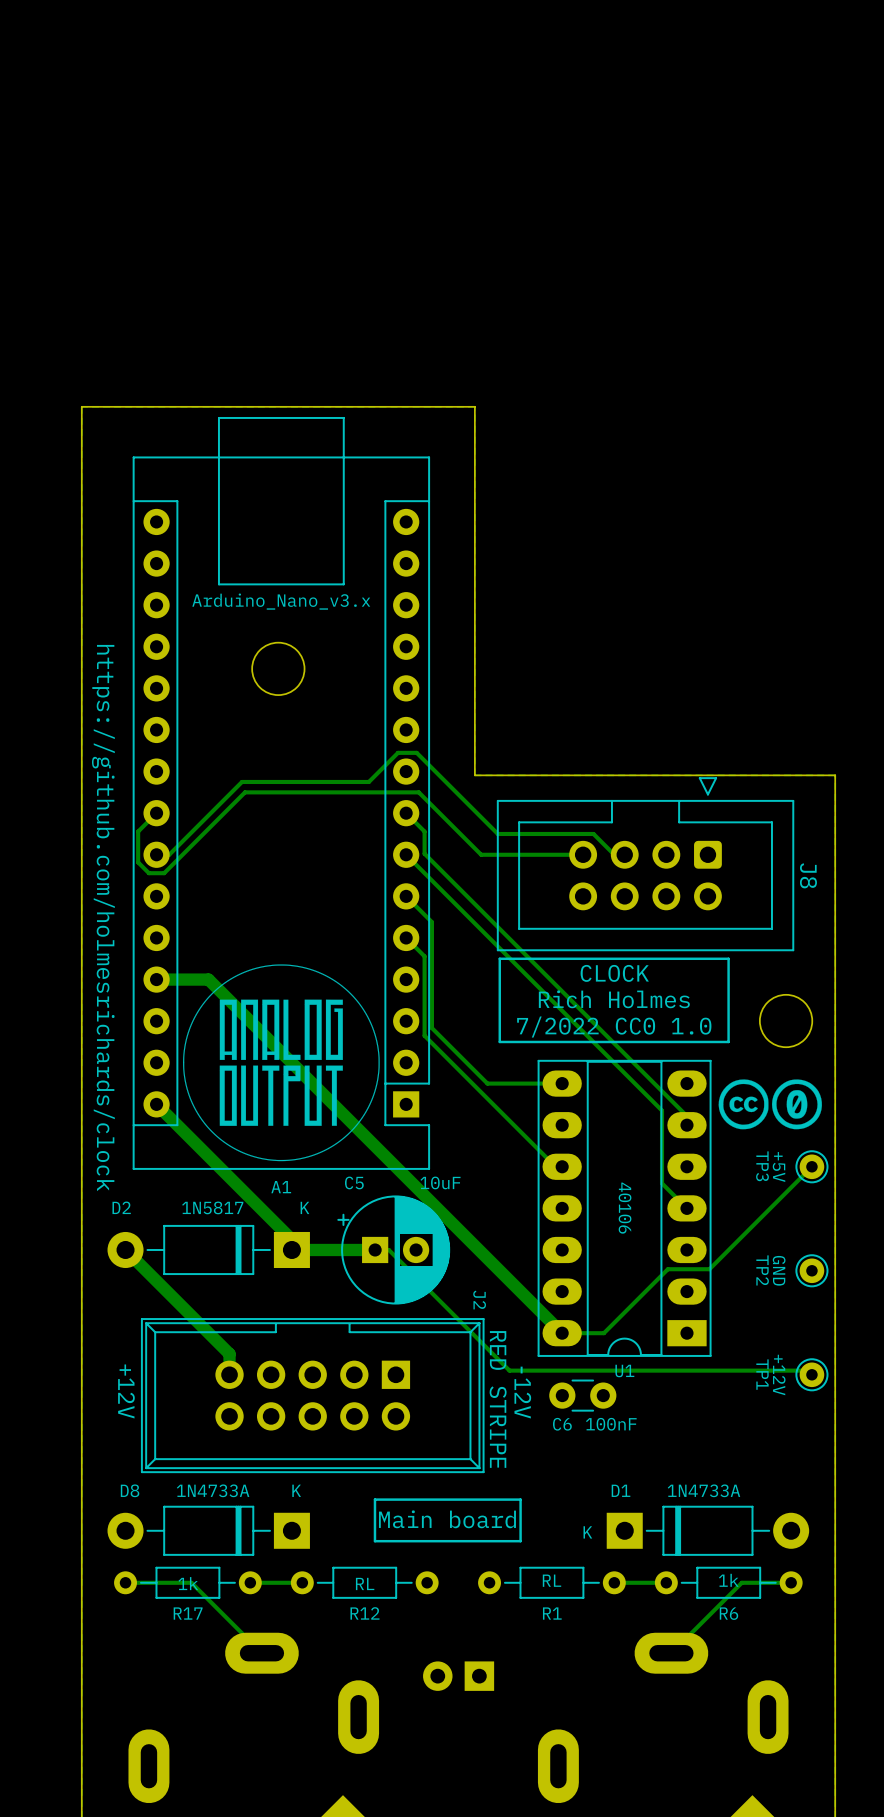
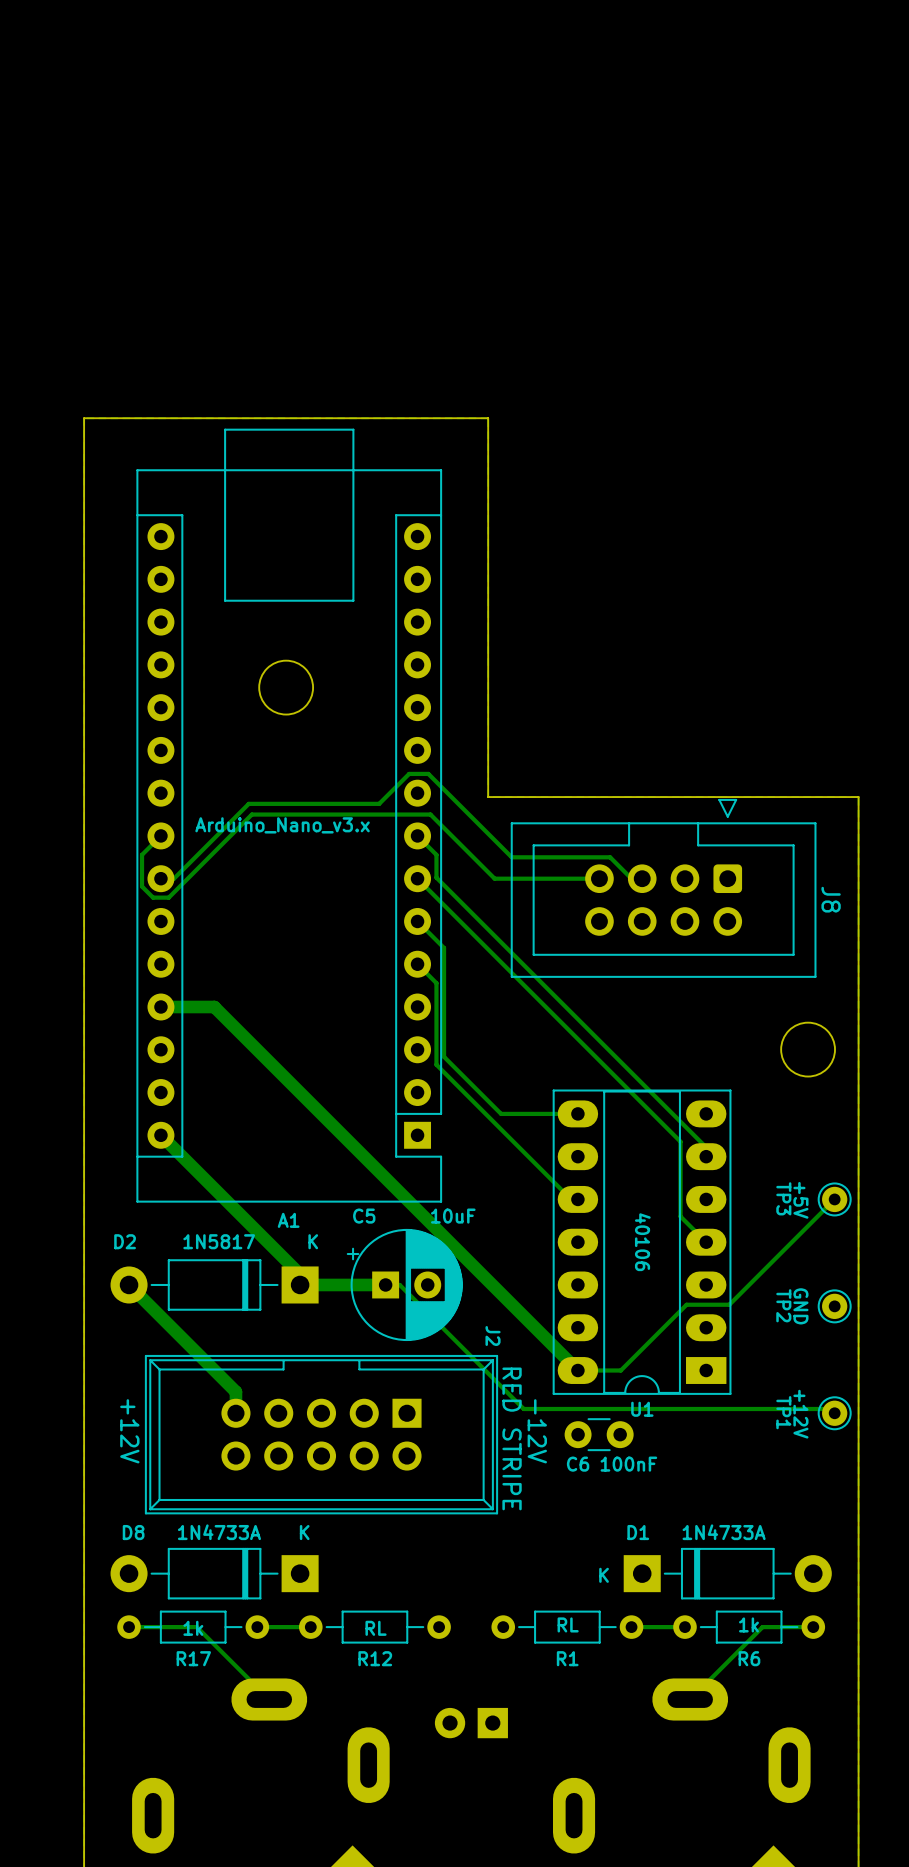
A1 value position: Arduino_Nano_v3.x (281, 601) -> Arduino_Nano_v3.x (282, 825)
text: https://github.com/holmesrichards/clock (103, 918) -> none
line: (728, 958) (499, 958) (499, 1041) (728, 1041) (728, 958) -> none
drawing: [183, 964, 380, 1162] -> none
text: CLOCK (614, 973) -> none
text: Rich Holmes (614, 999) -> none
text: 7/2022 CC0 1.0 (614, 1027) -> none
drawing: [718, 1079, 822, 1130] -> none
line: (520, 1499) (520, 1541) (374, 1541) (374, 1499) (520, 1499) -> none
text: Main board (447, 1519) -> none

